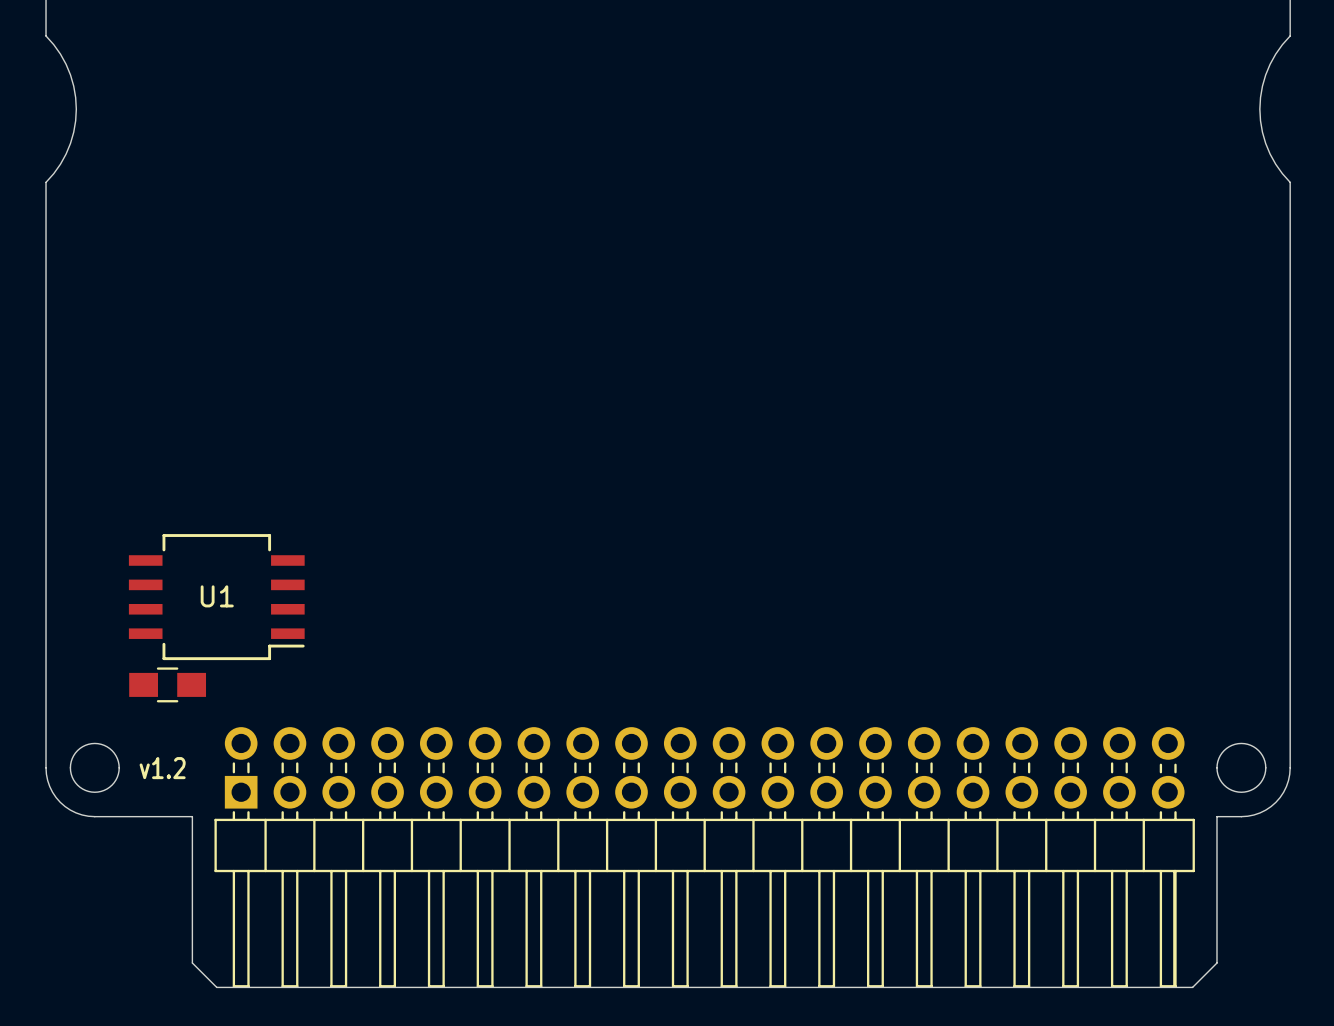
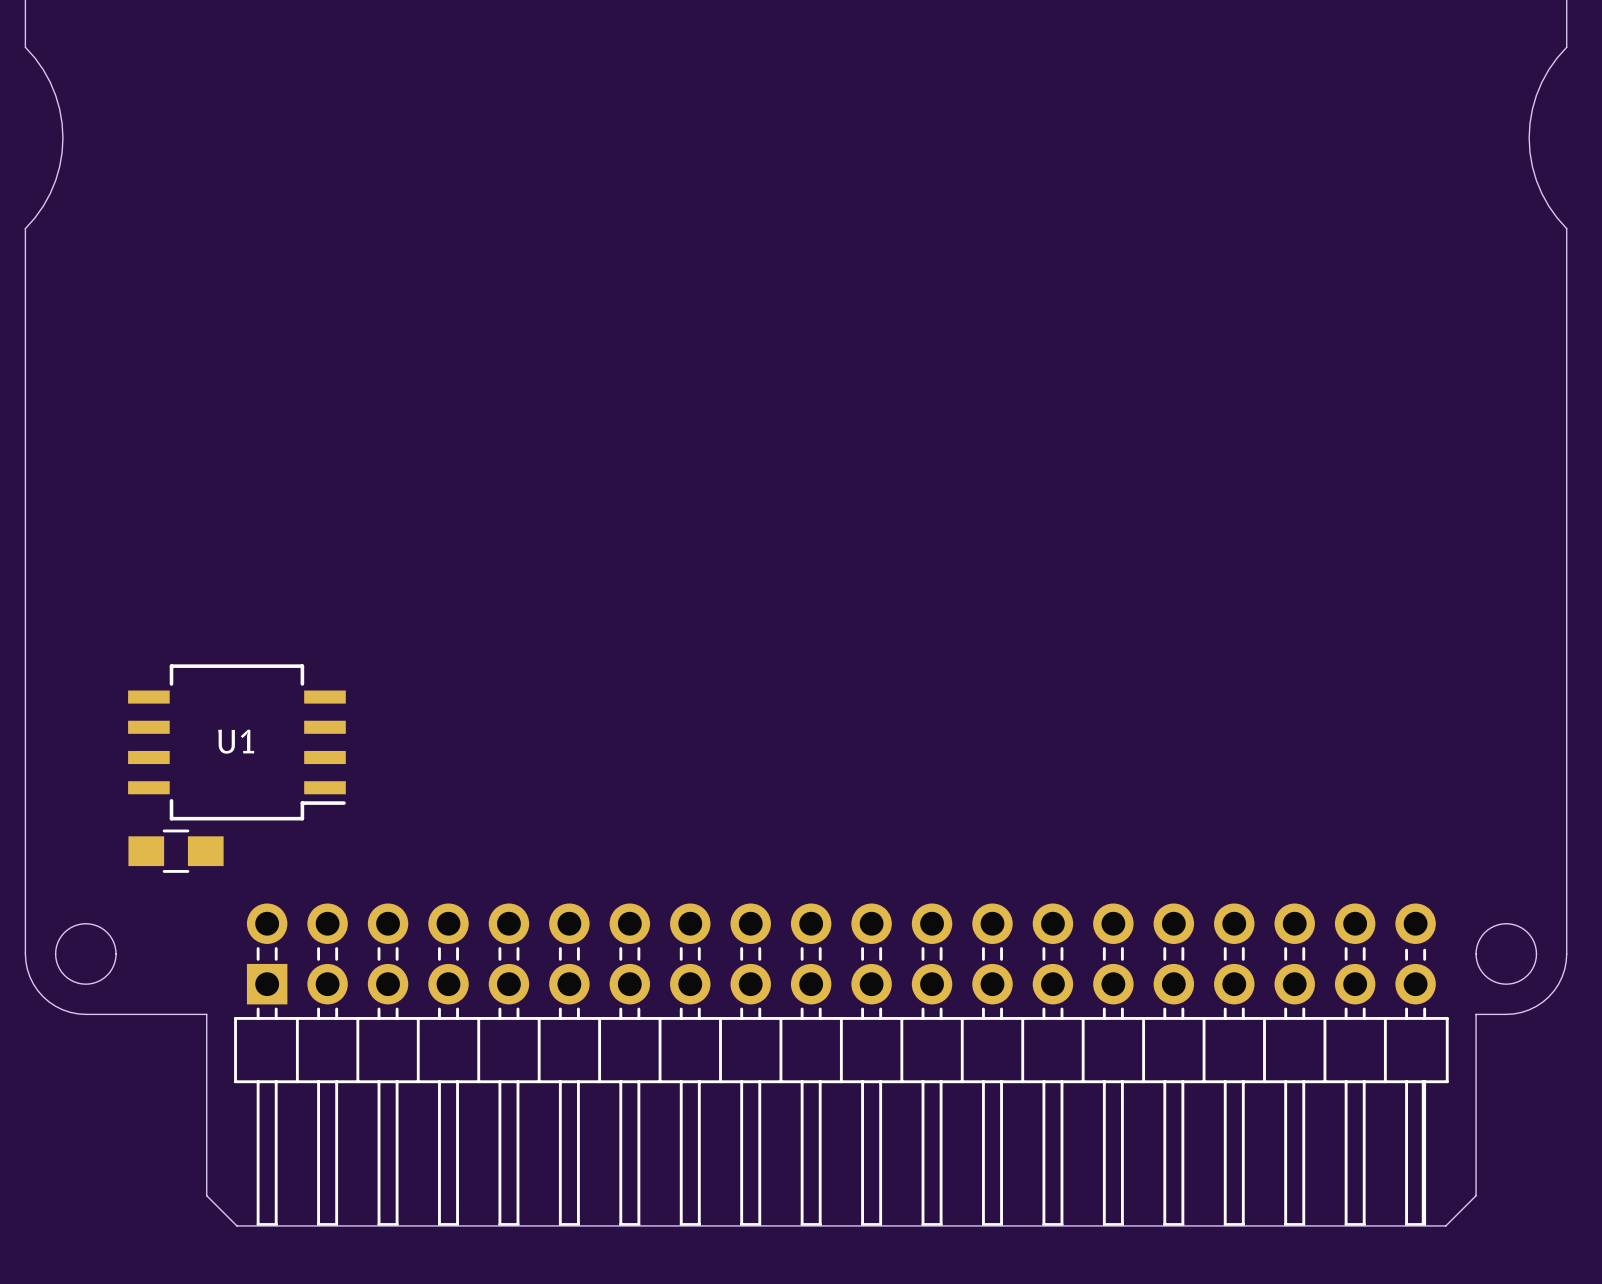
text: v1.2 (162, 768) -> none

